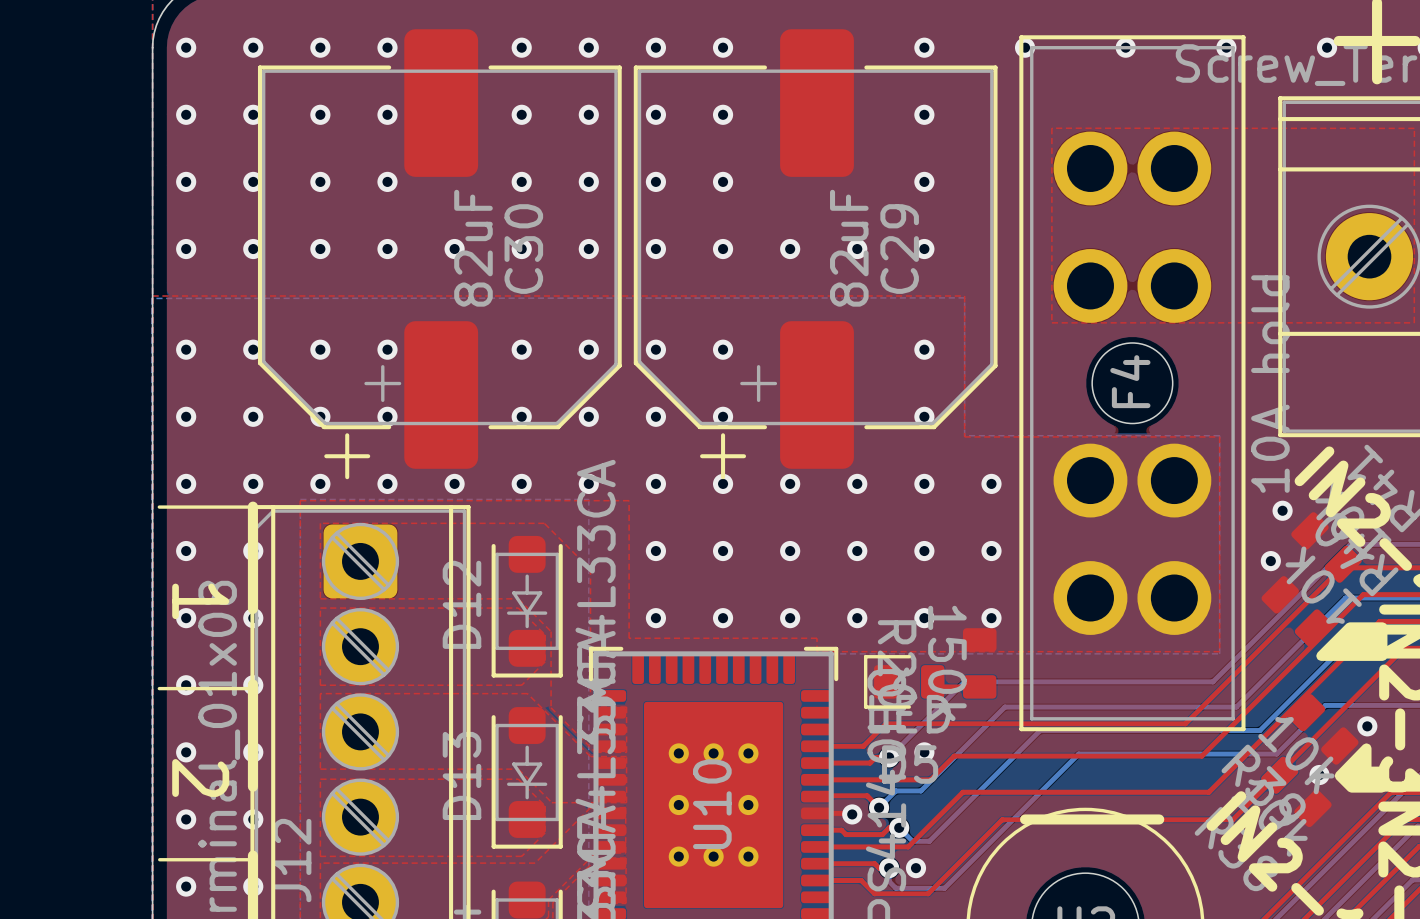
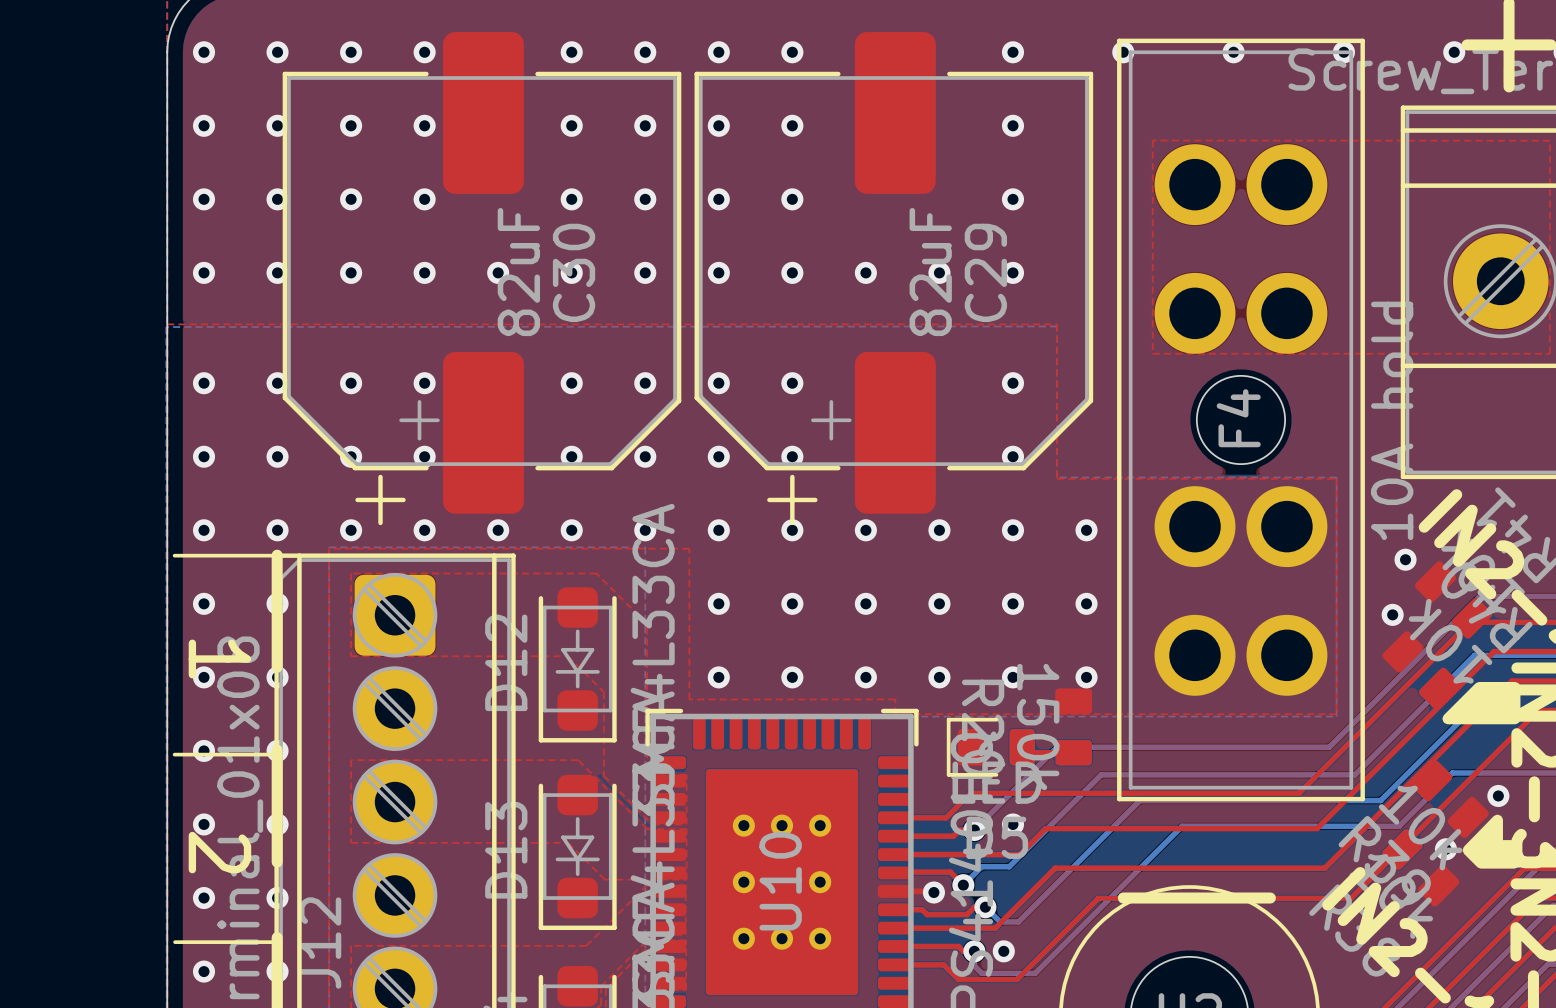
top zone outline: (320, 608) (320, 685) (521, 685) (545, 661) (545, 634) (518, 608) (320, 608) -> none
top zone outline: (320, 779) (320, 856) (521, 856) (545, 832) (545, 806) (518, 779) (320, 779) -> none

